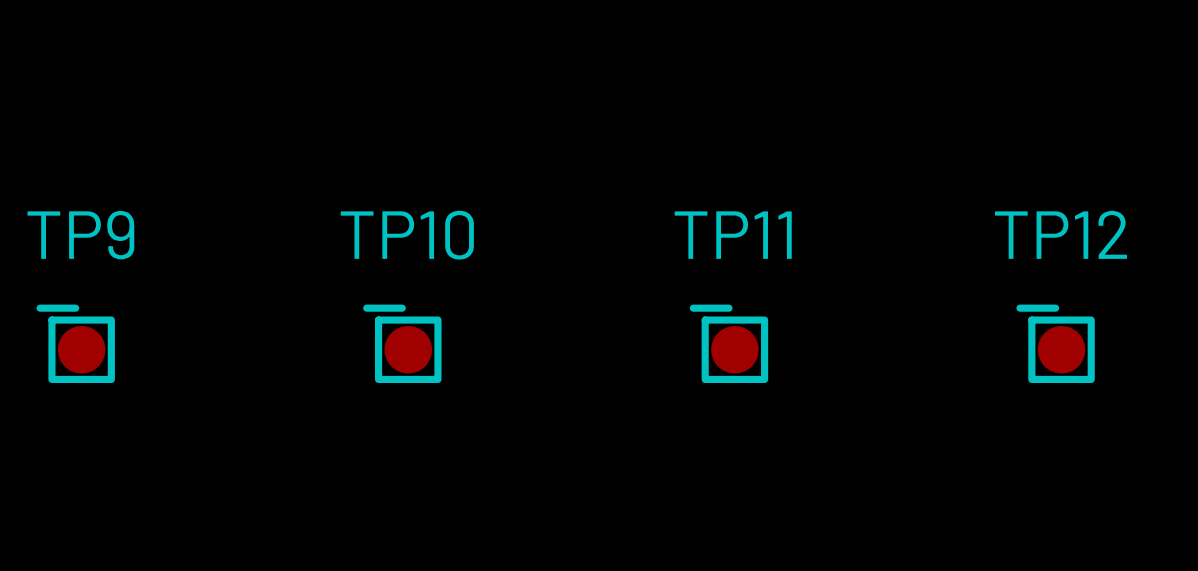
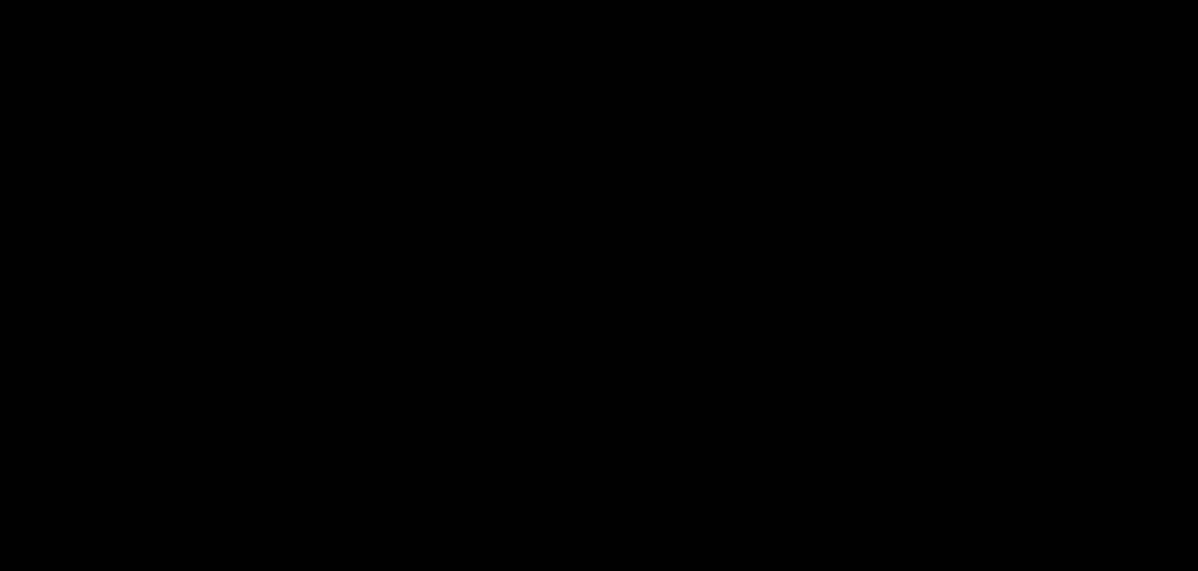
TP9: (75, 343) -> none
TP10: (402, 343) -> none
TP11: (728, 343) -> none
TP12: (1055, 343) -> none

